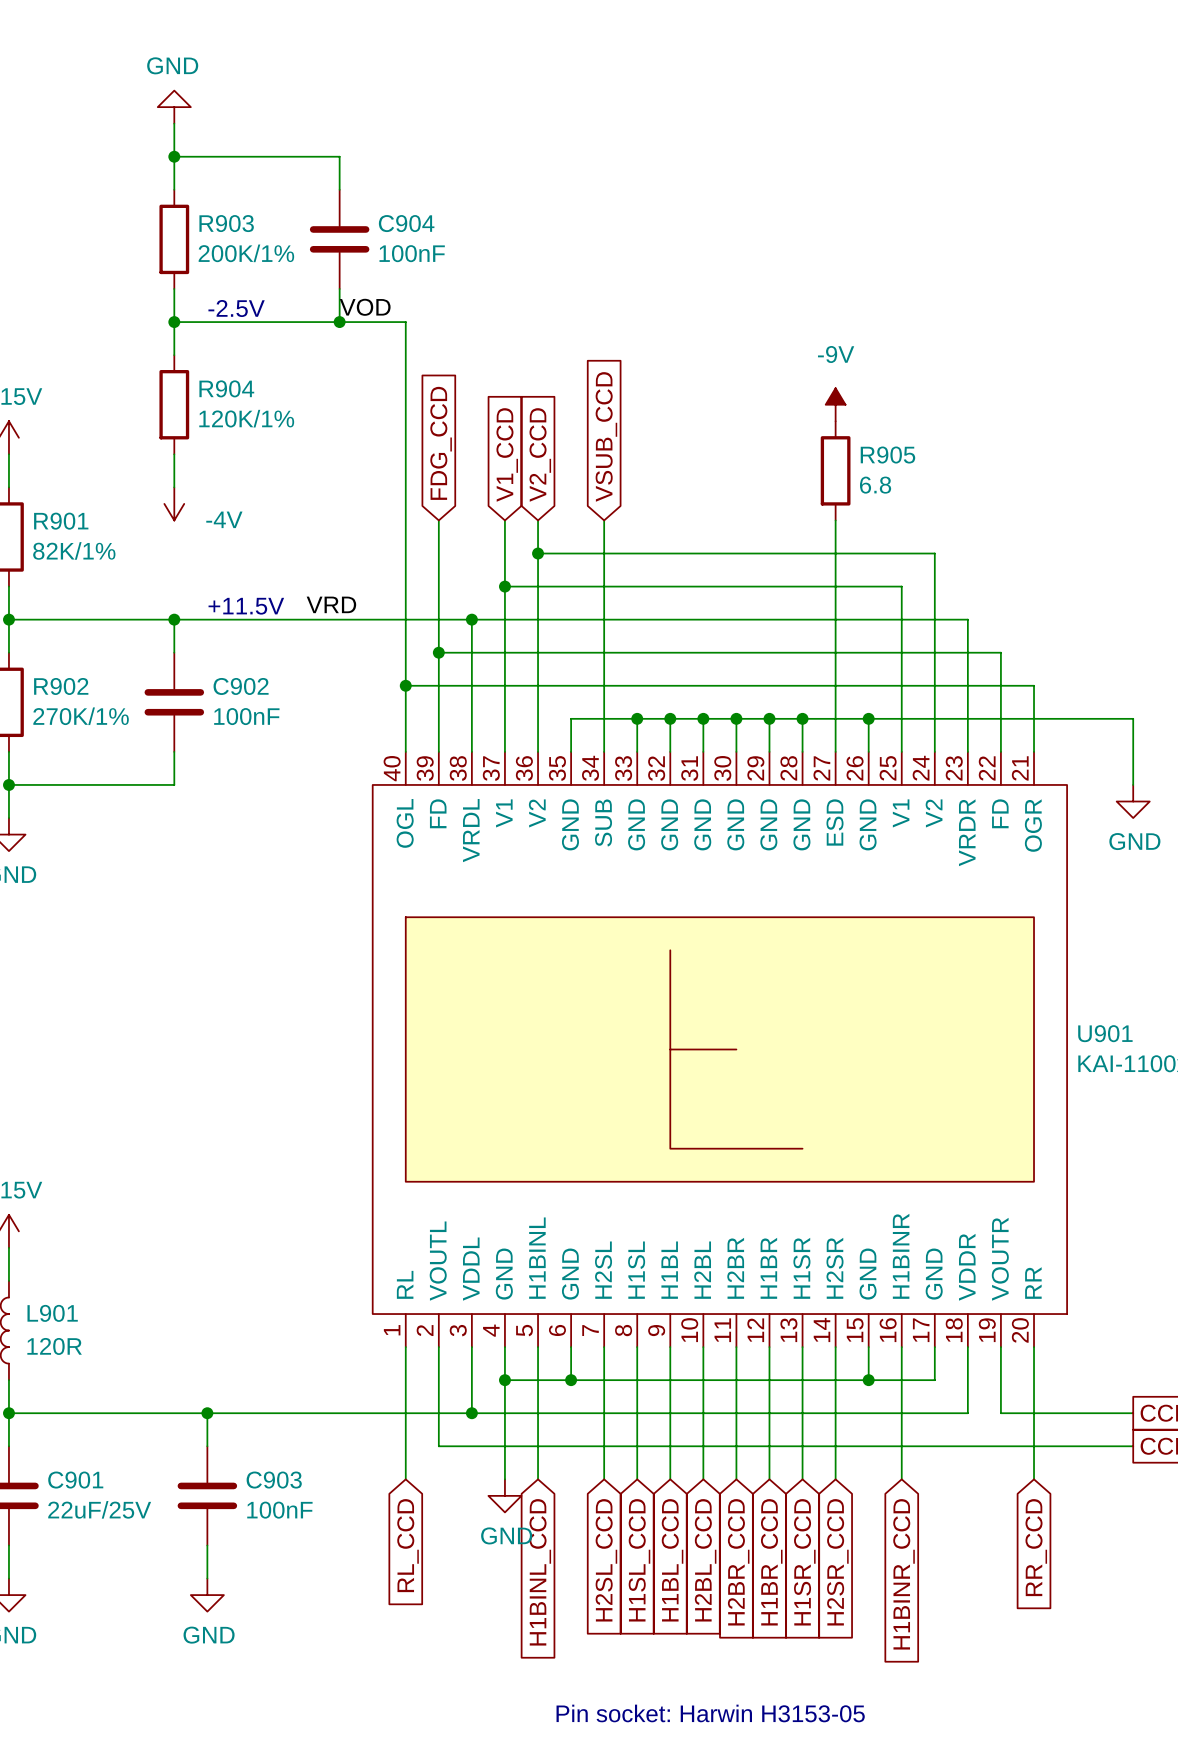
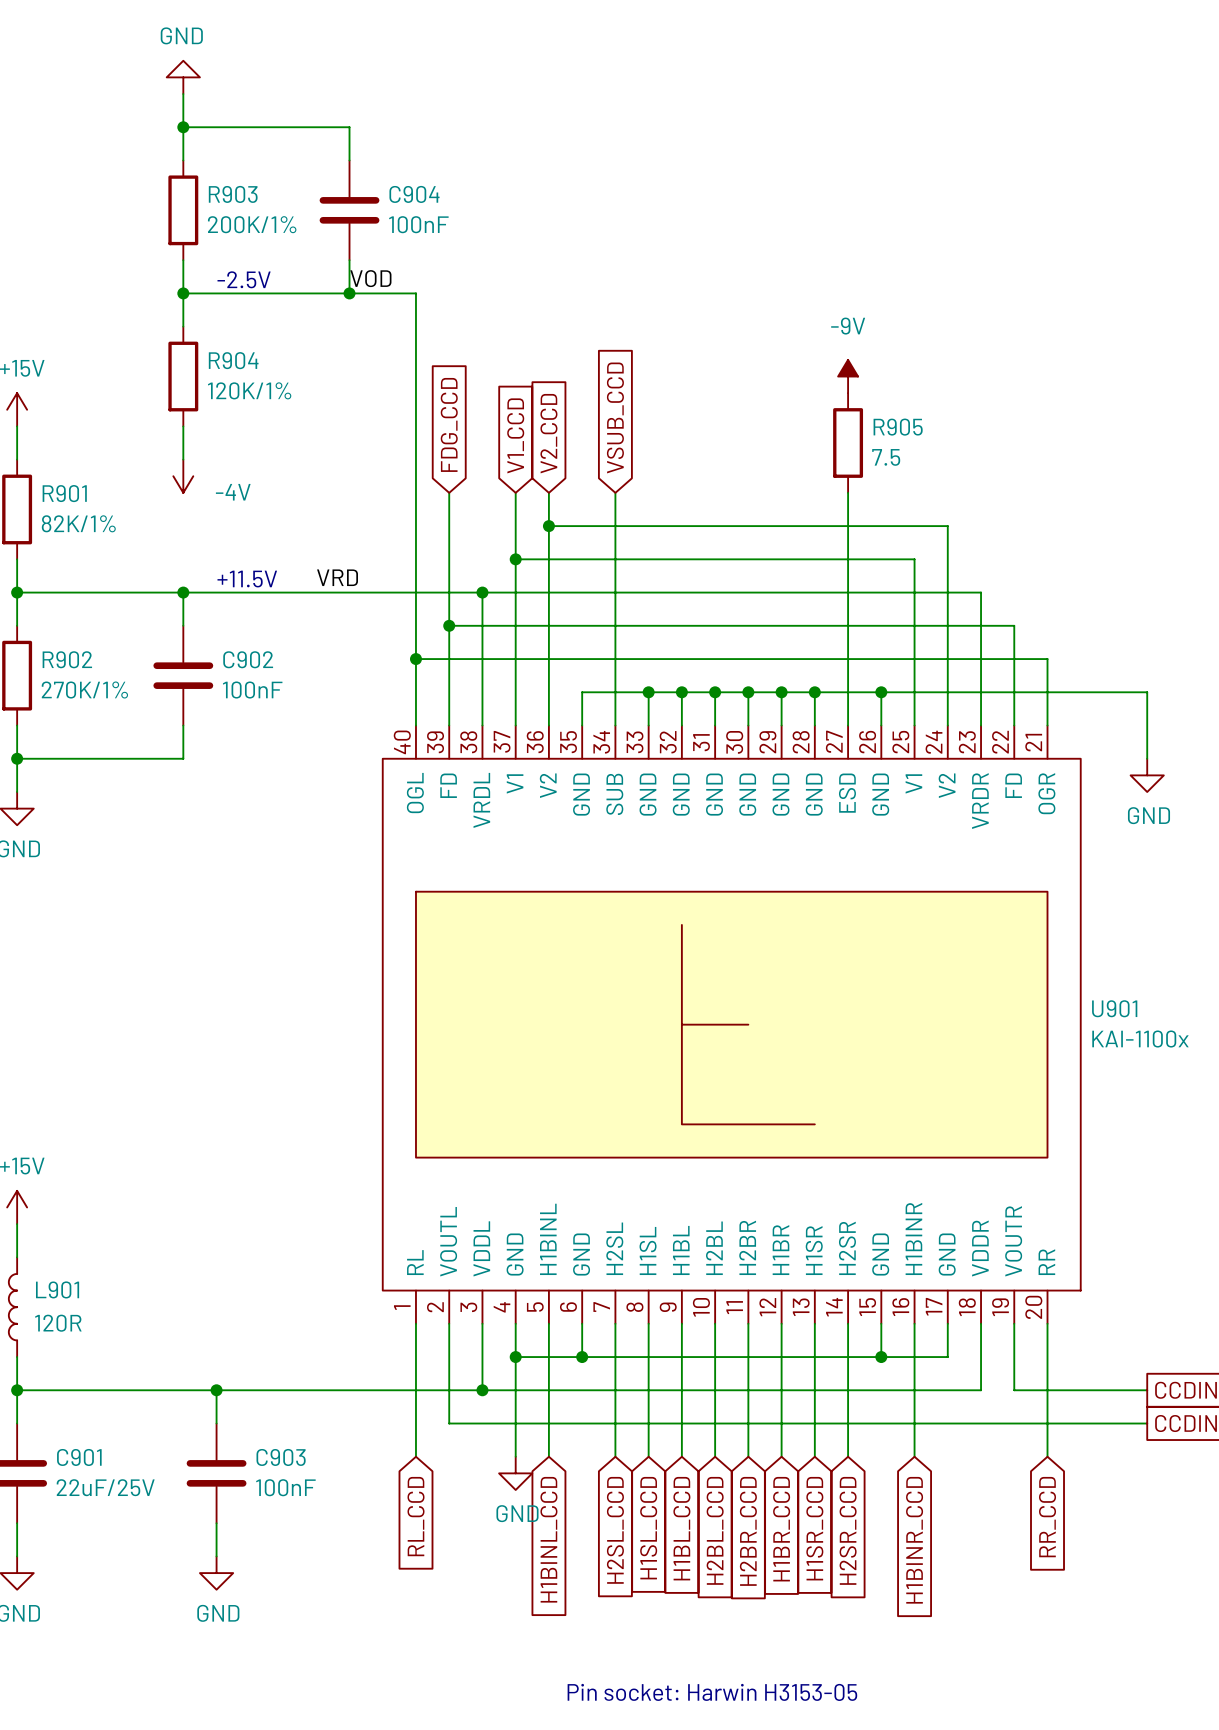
R905 value: 6.8 (875, 485) -> 7.5 (886, 457)

